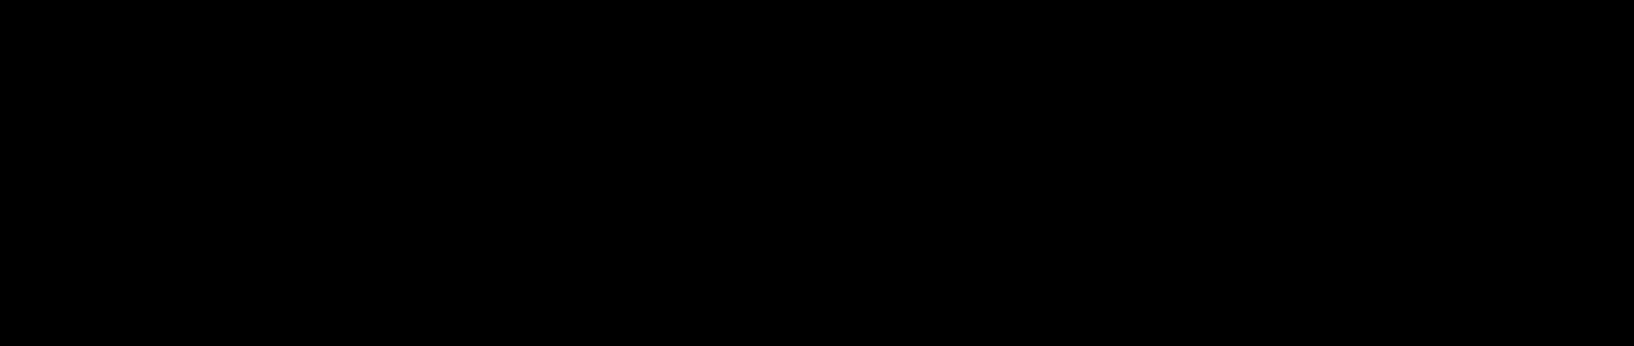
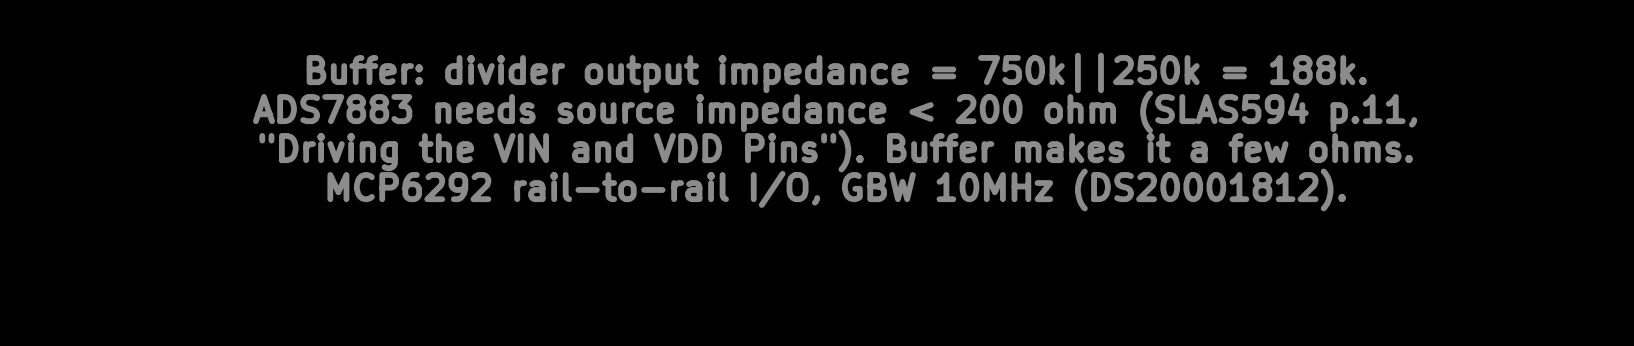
text: none -> Buffer: divider output impedance = 750k||250k = 188k. (836, 72)
text: none -> ADS7883 needs source impedance < 200 ohm (SLAS594 p.11, (835, 111)
text: none -> "Driving the VIN and VDD Pins"). Buffer makes it a few ohms. (836, 150)
text: none -> MCP6292 rail-to-rail I/O, GBW 10MHz (DS20001812). (836, 189)

